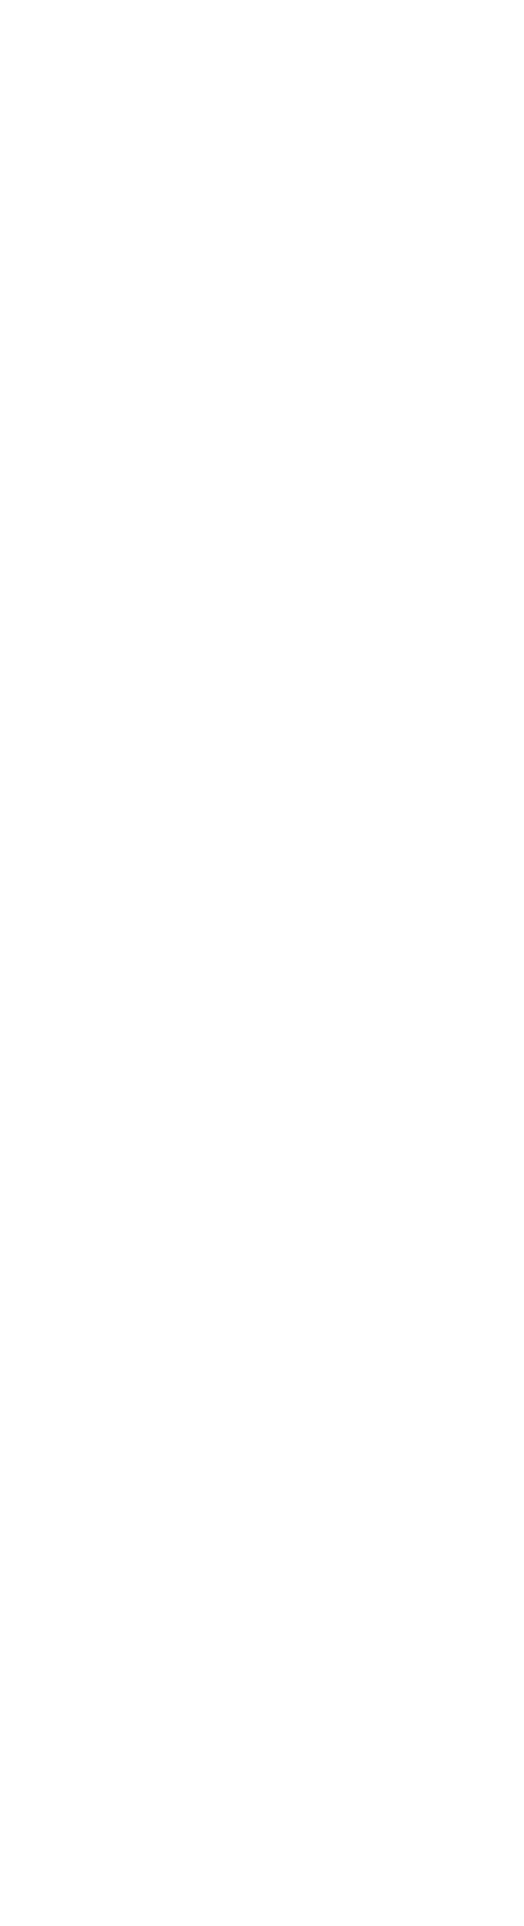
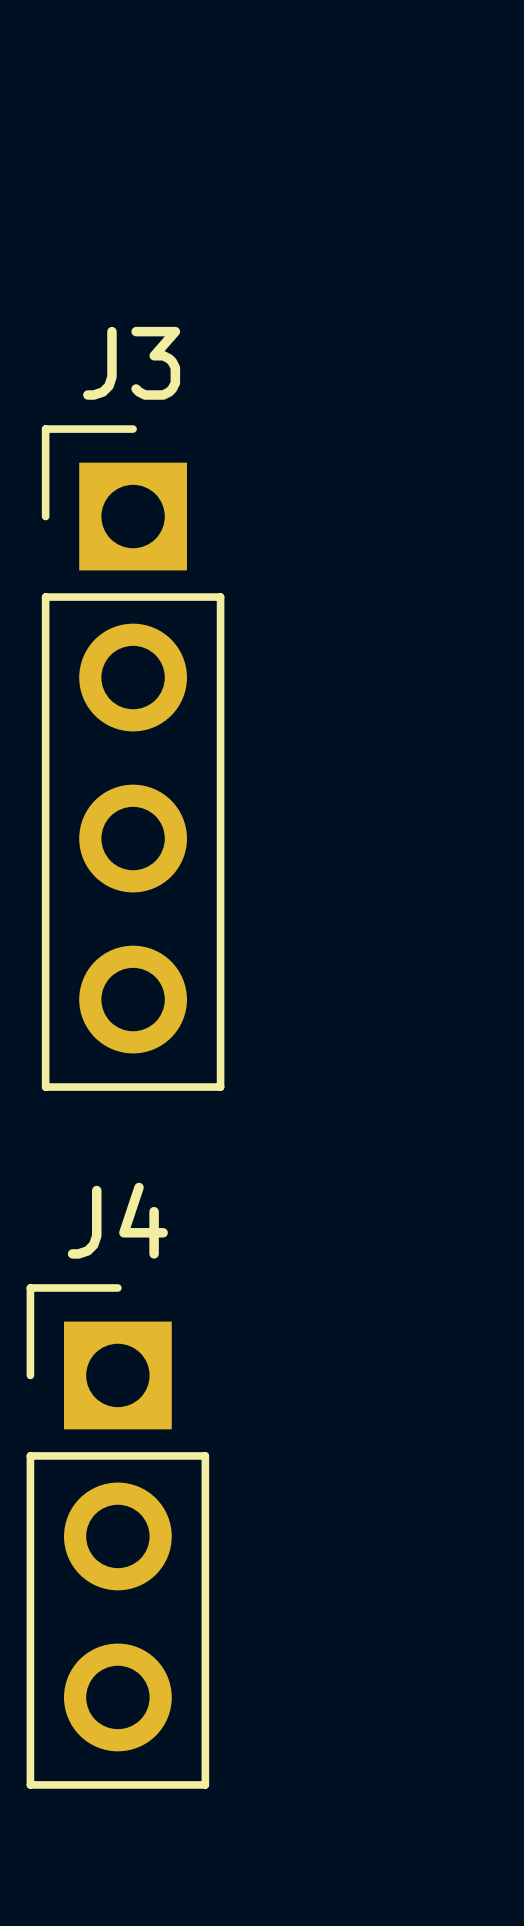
J3: none -> (133, 758)
J4: none -> (117, 1536)

